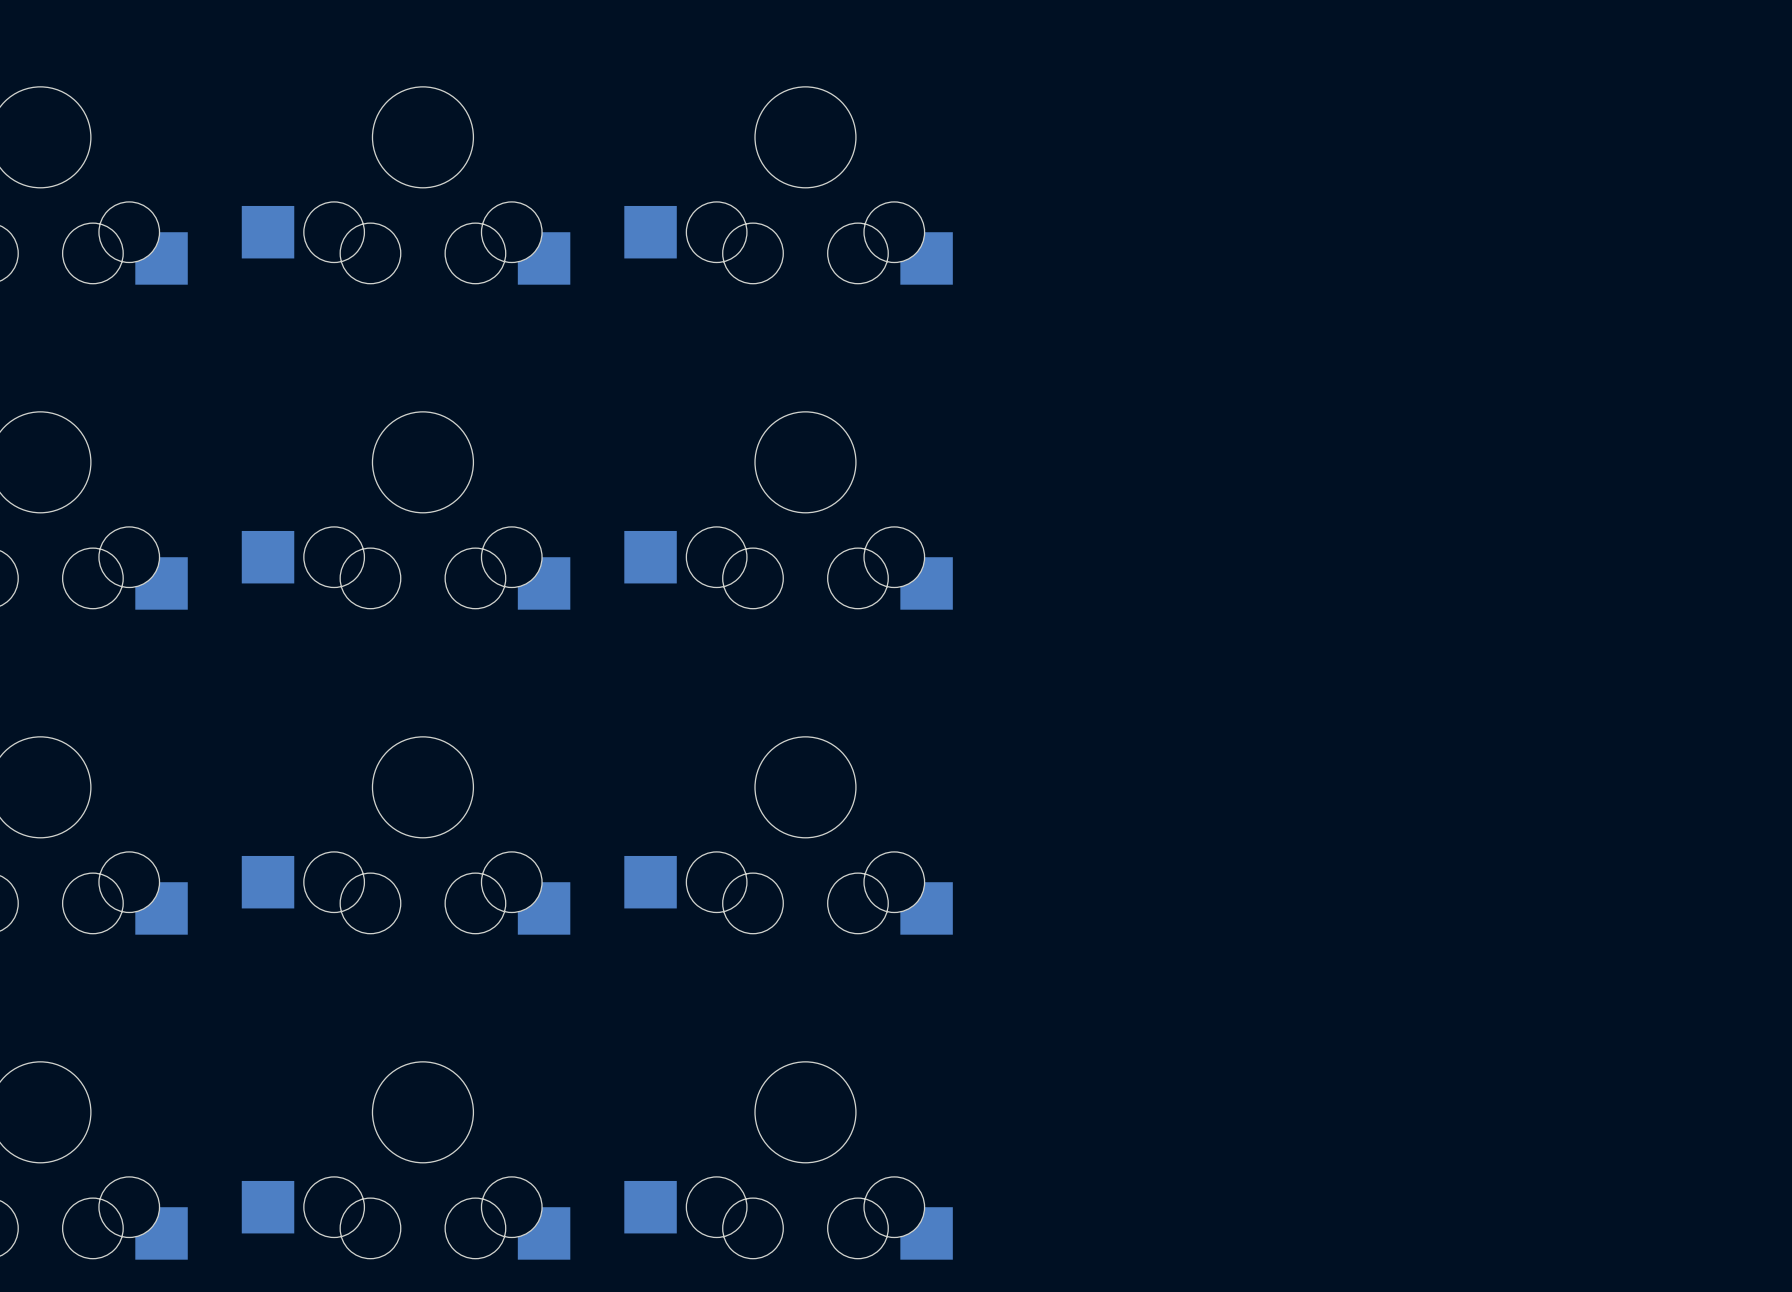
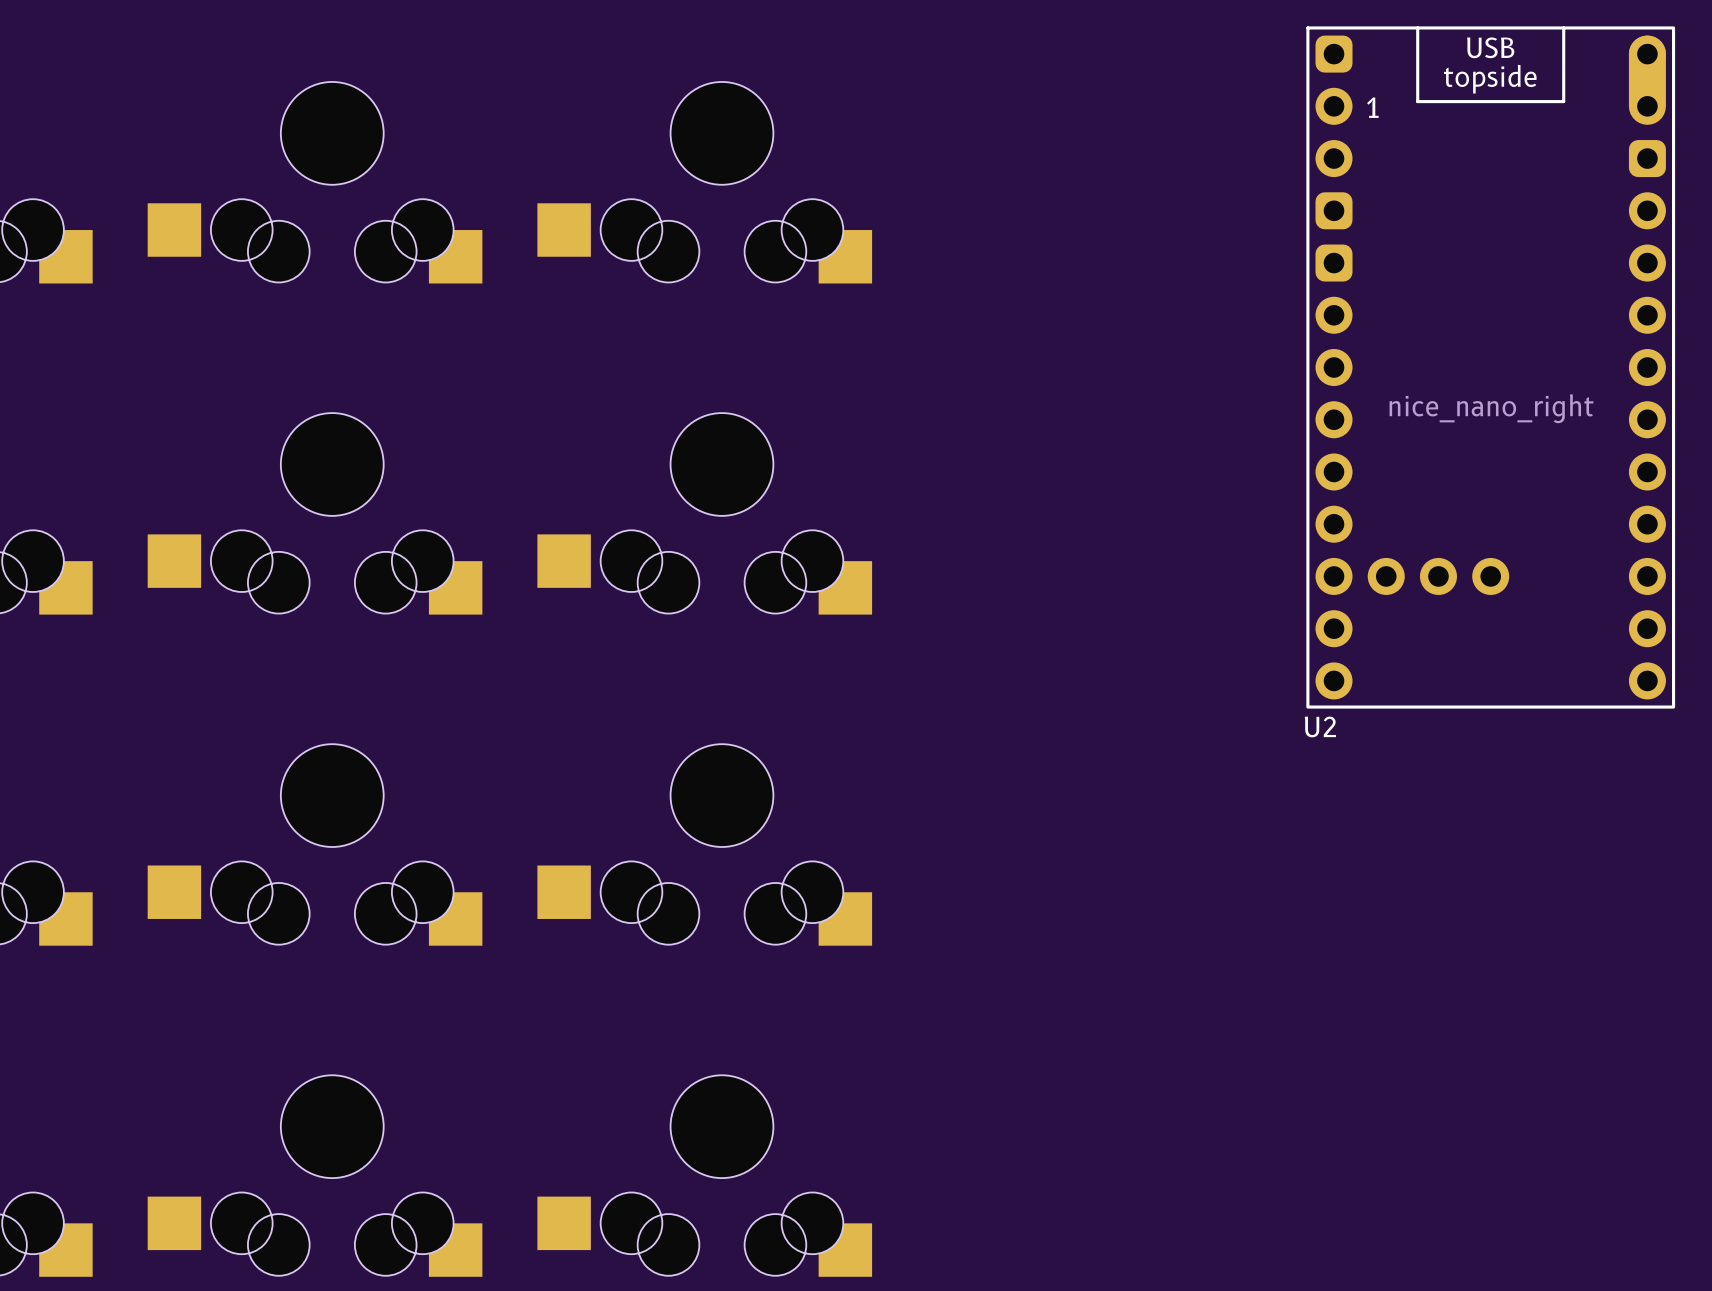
U2: none -> nice_nano_right (1490, 367)

